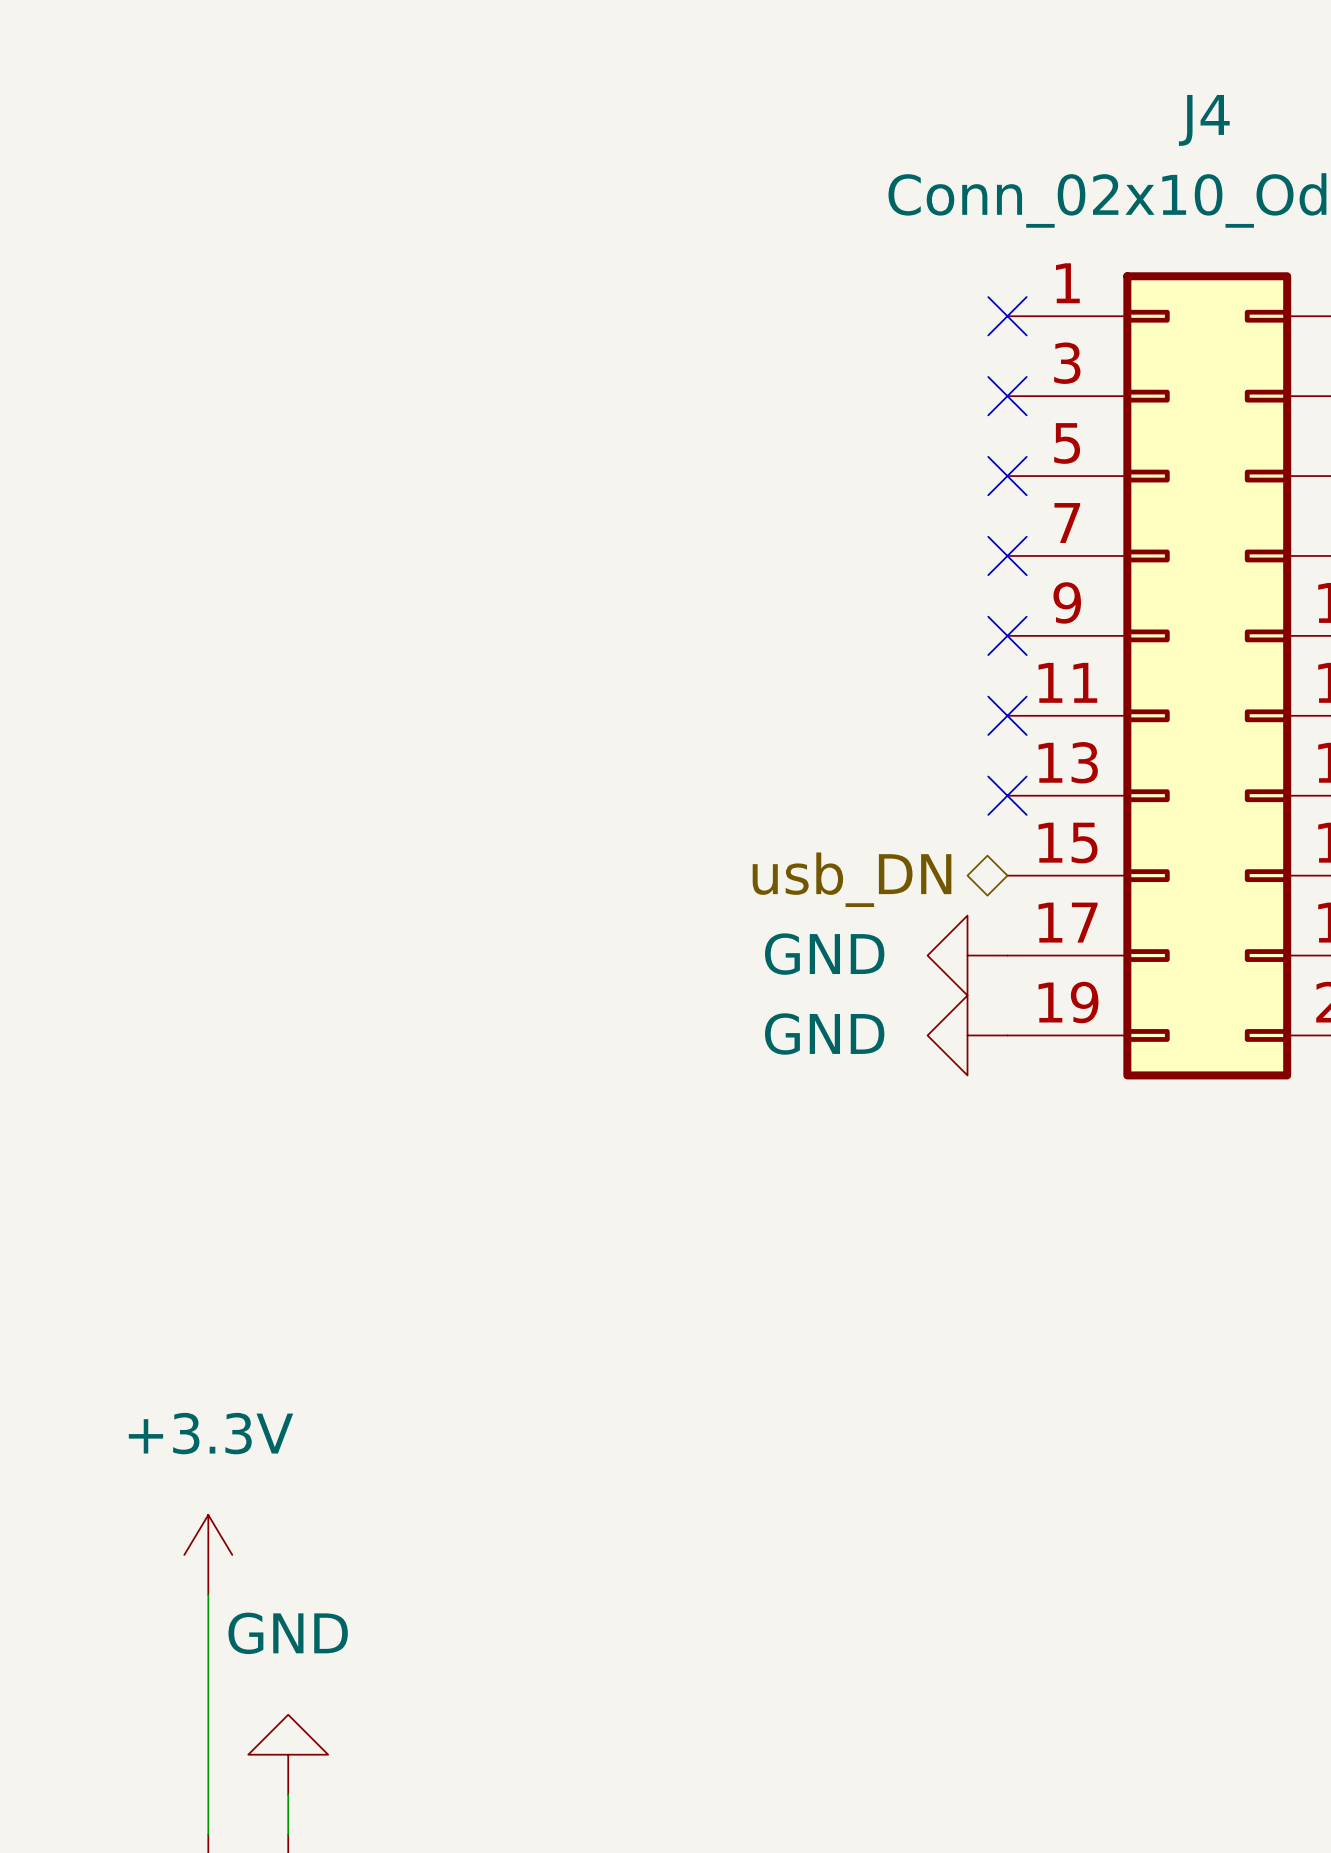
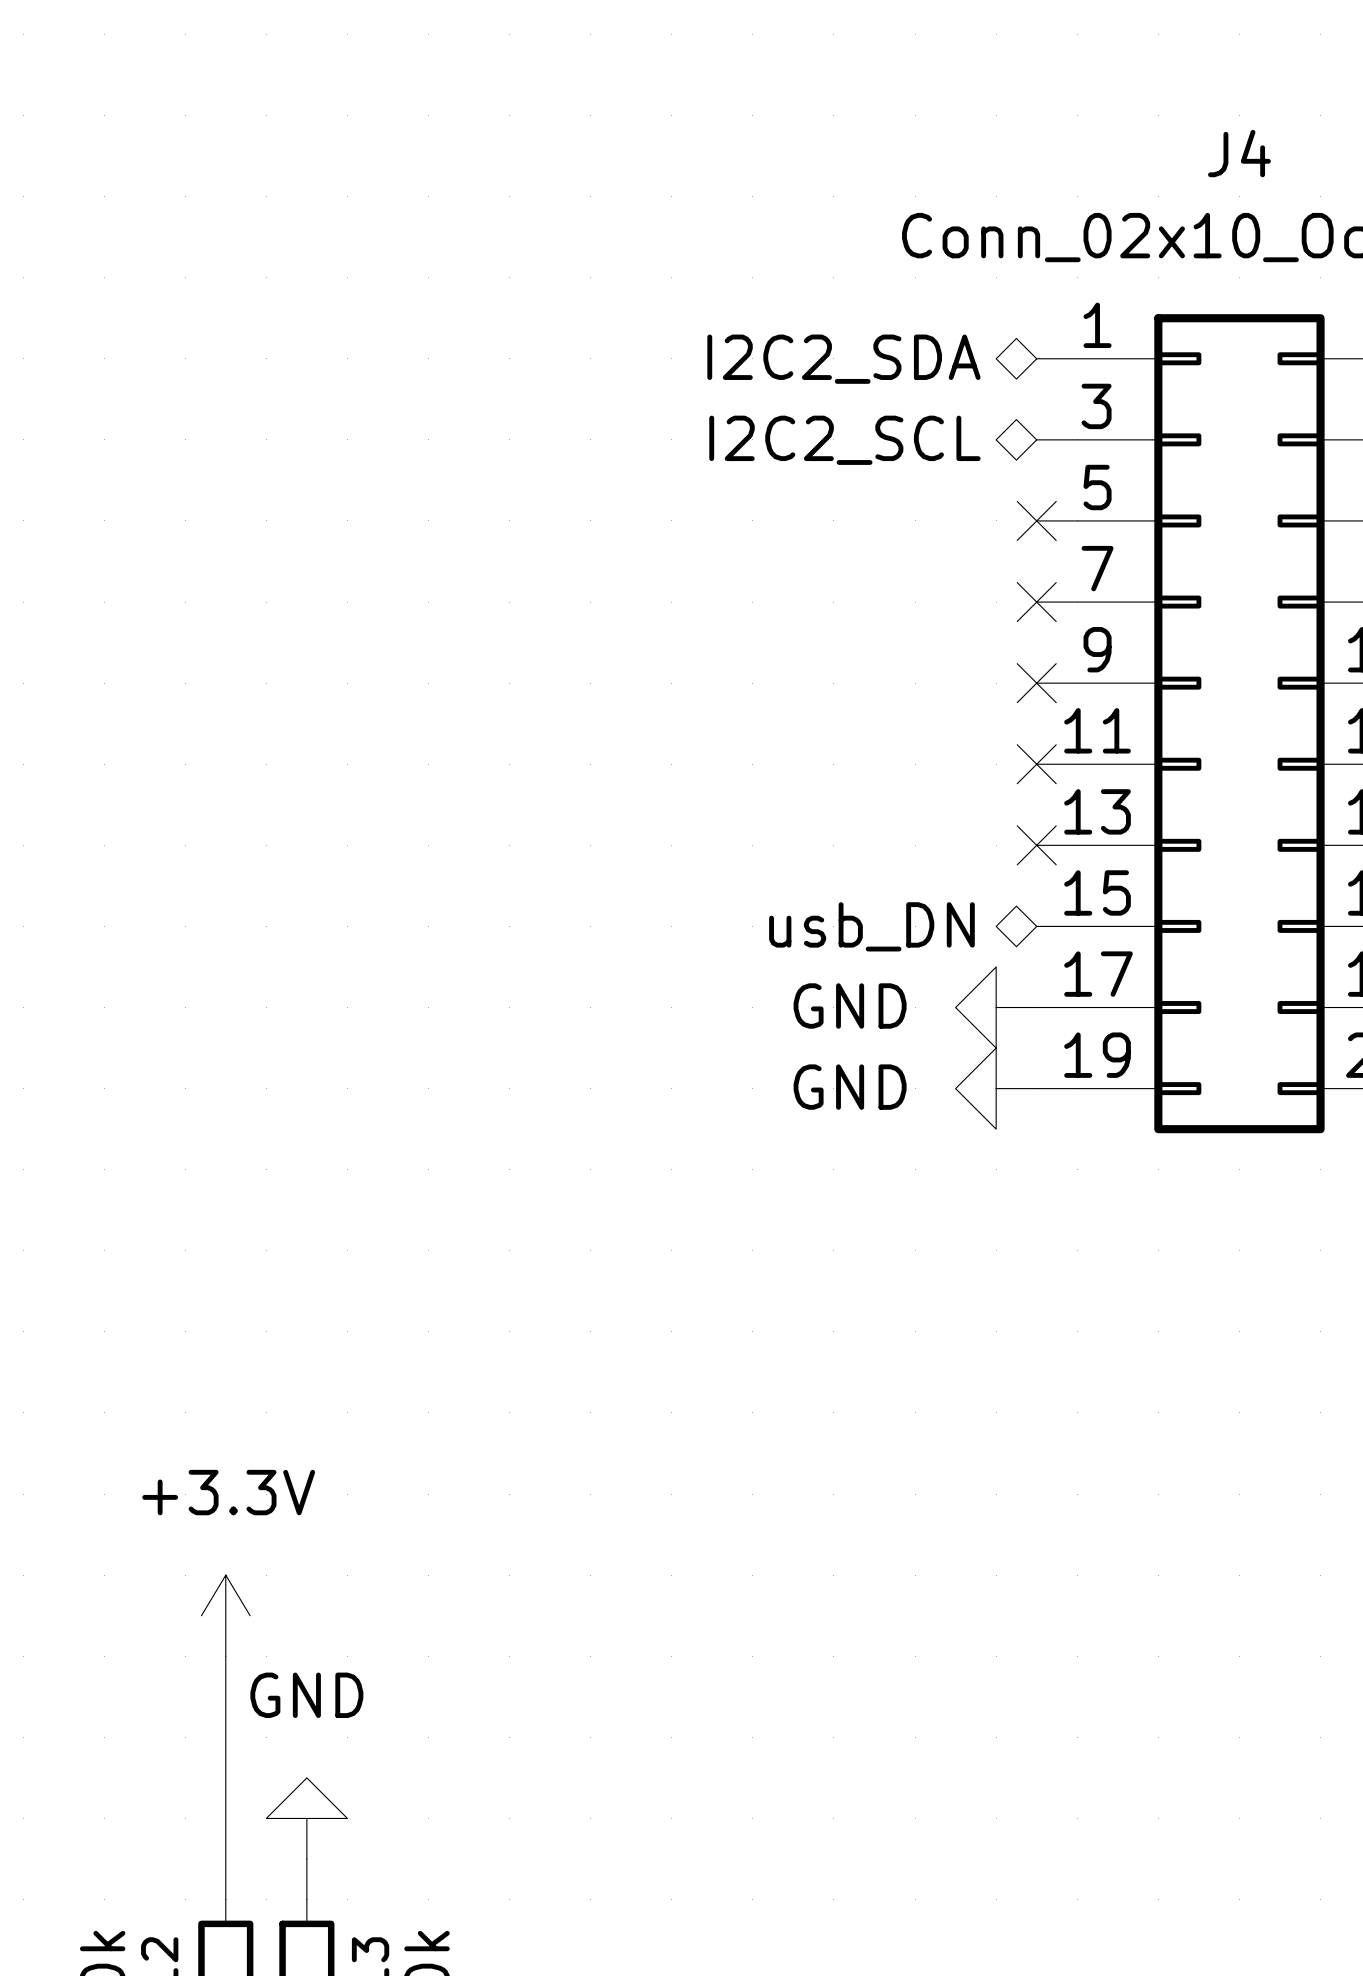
no-connect mark: (1007, 316) -> none
hierarchical label: none -> I2C2_SDA (843, 359)
no-connect mark: (1007, 396) -> none
hierarchical label: none -> I2C2_SCL (844, 440)

